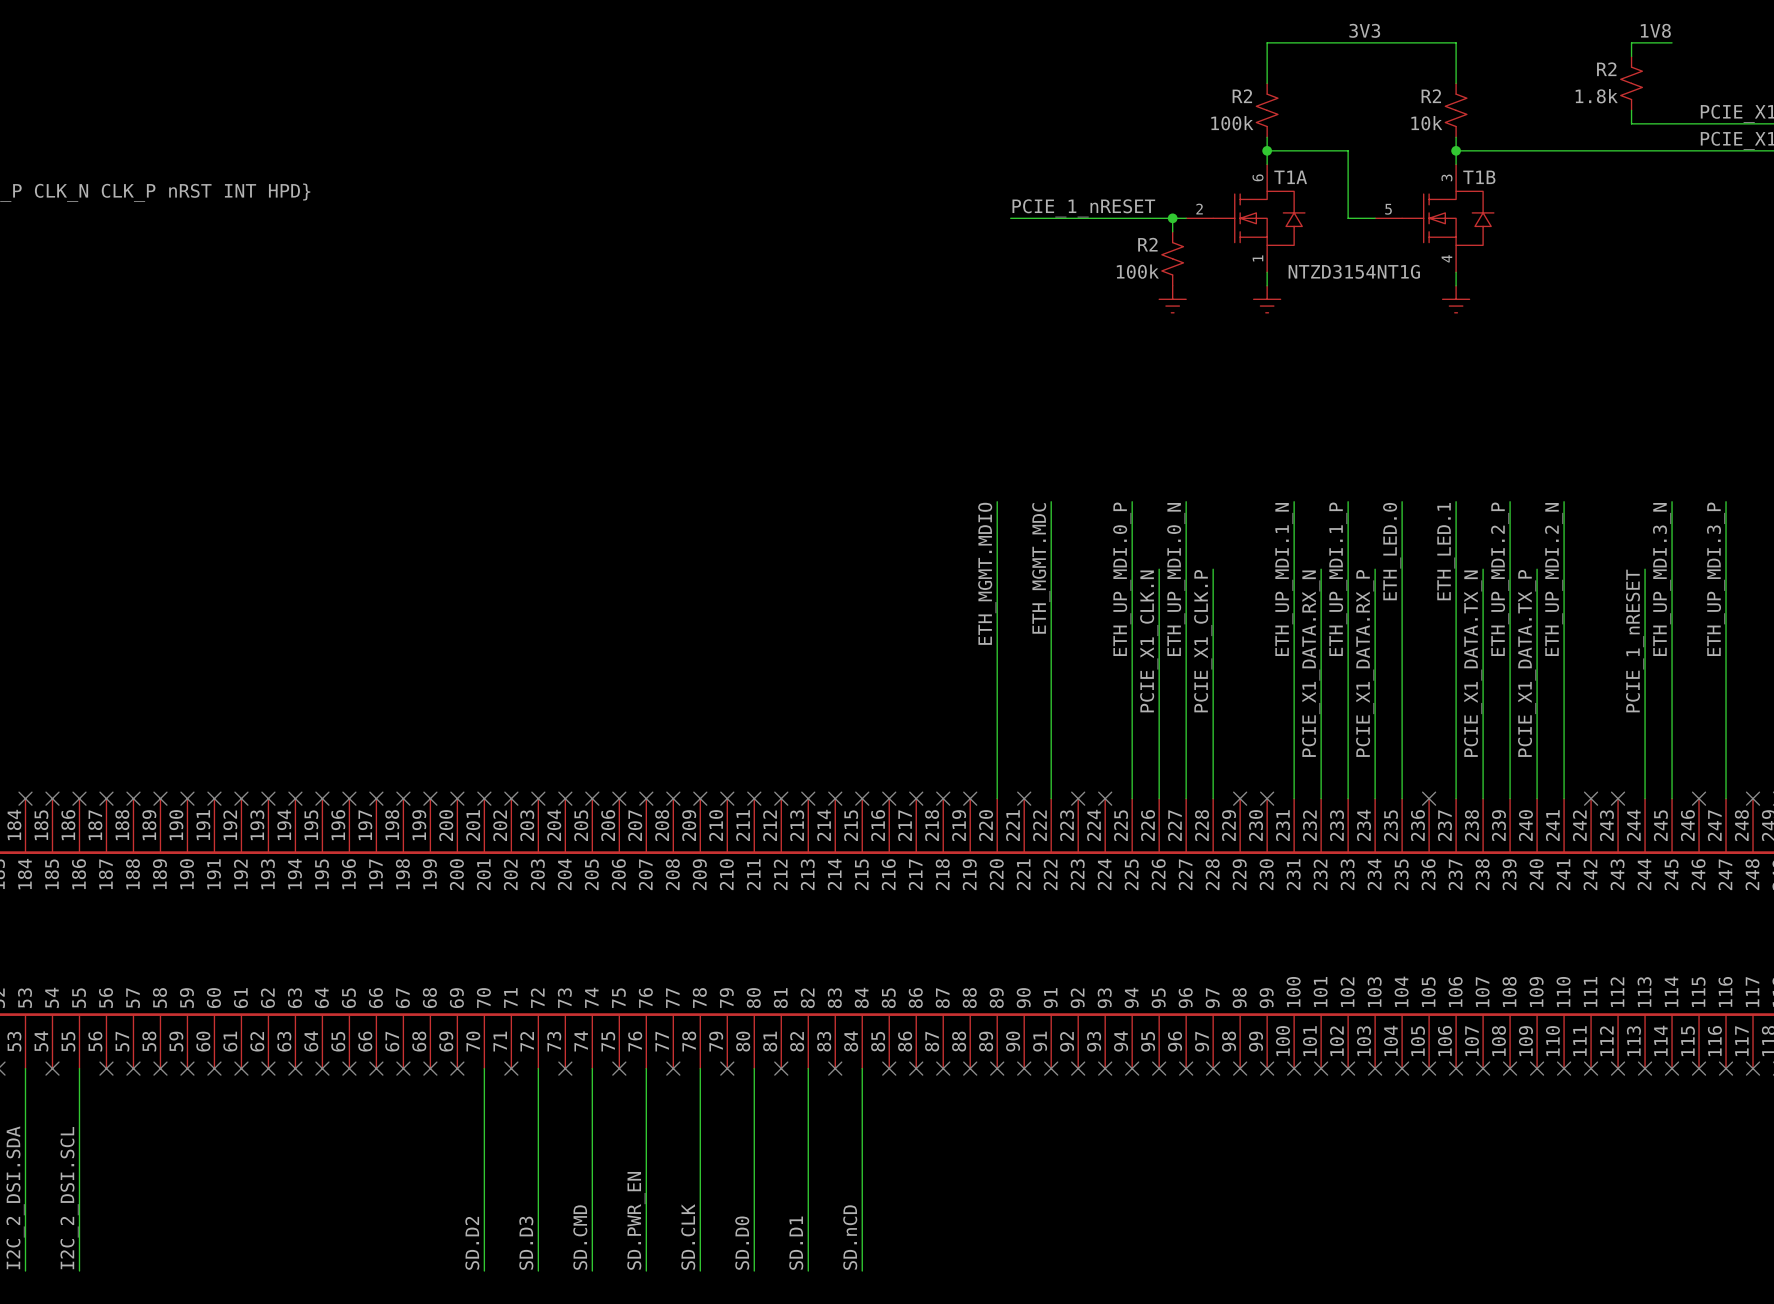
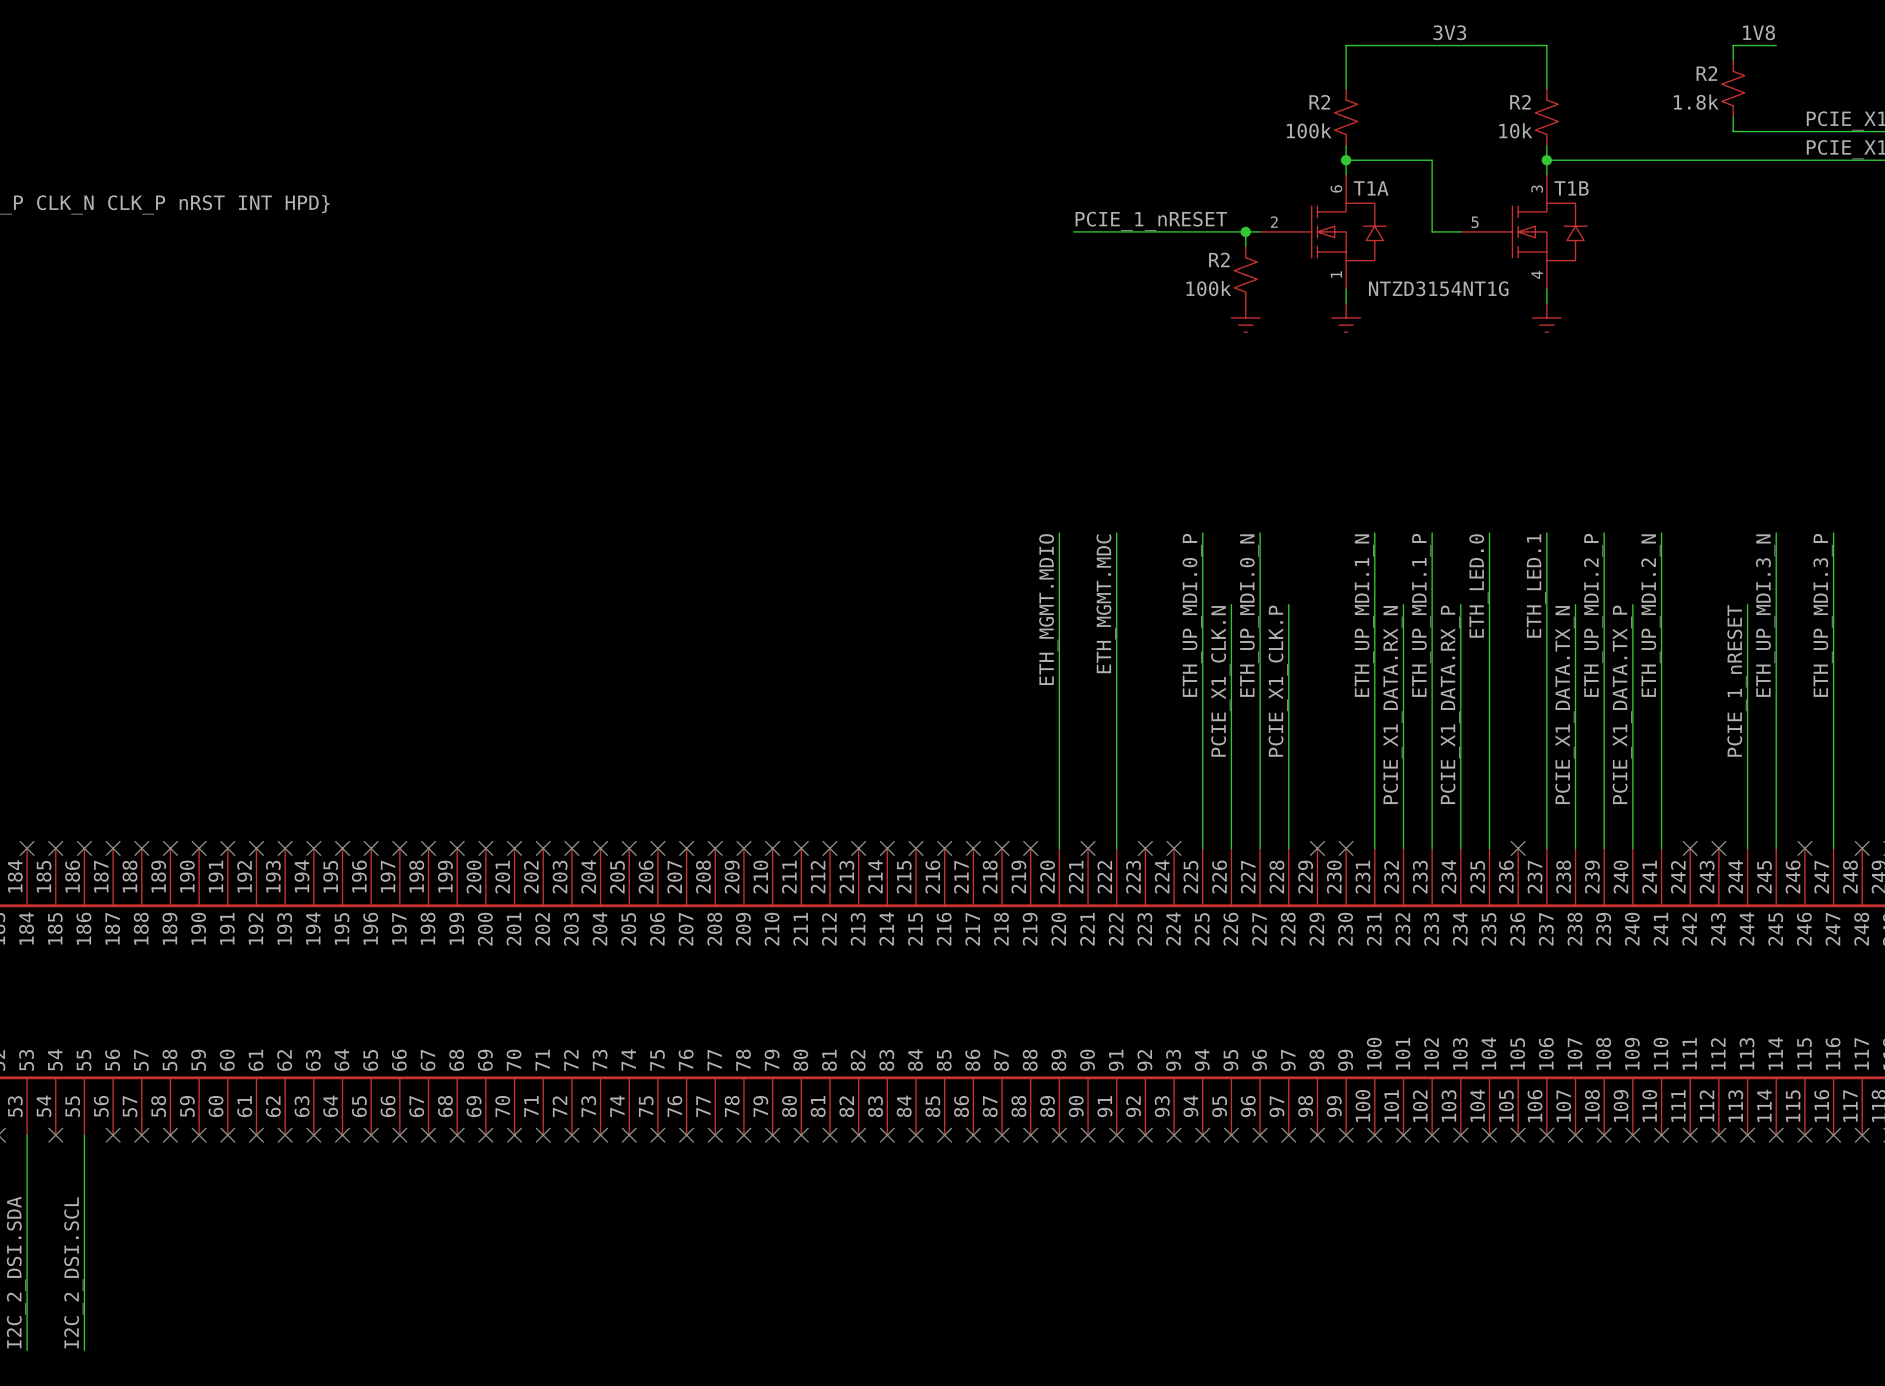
wire: (484, 1068) (484, 1271) -> none
no-connect mark: none -> (514, 1135)
wire: (538, 1068) (538, 1271) -> none
no-connect mark: none -> (571, 1135)
wire: (592, 1068) (592, 1271) -> none
no-connect mark: none -> (629, 1135)
wire: (646, 1068) (646, 1271) -> none
no-connect mark: none -> (686, 1135)
wire: (700, 1068) (700, 1271) -> none
no-connect mark: none -> (743, 1135)
wire: (754, 1068) (754, 1271) -> none
no-connect mark: none -> (801, 1135)
wire: (808, 1068) (808, 1271) -> none
no-connect mark: none -> (858, 1135)
wire: (862, 1068) (862, 1271) -> none
no-connect mark: none -> (916, 1135)
label: SD.PWR_EN (636, 1220) -> none
label: SD.CMD (580, 1237) -> none
label: SD.CLK (688, 1237) -> none
label: SD.nCD (850, 1237) -> none
label: SD.D2 (472, 1243) -> none
label: SD.D3 (526, 1243) -> none
label: SD.D0 (742, 1243) -> none
label: SD.D1 (796, 1243) -> none

